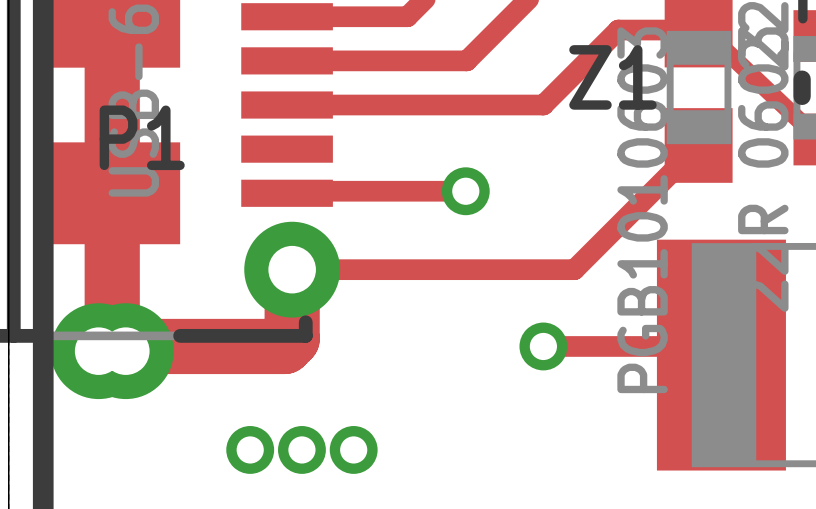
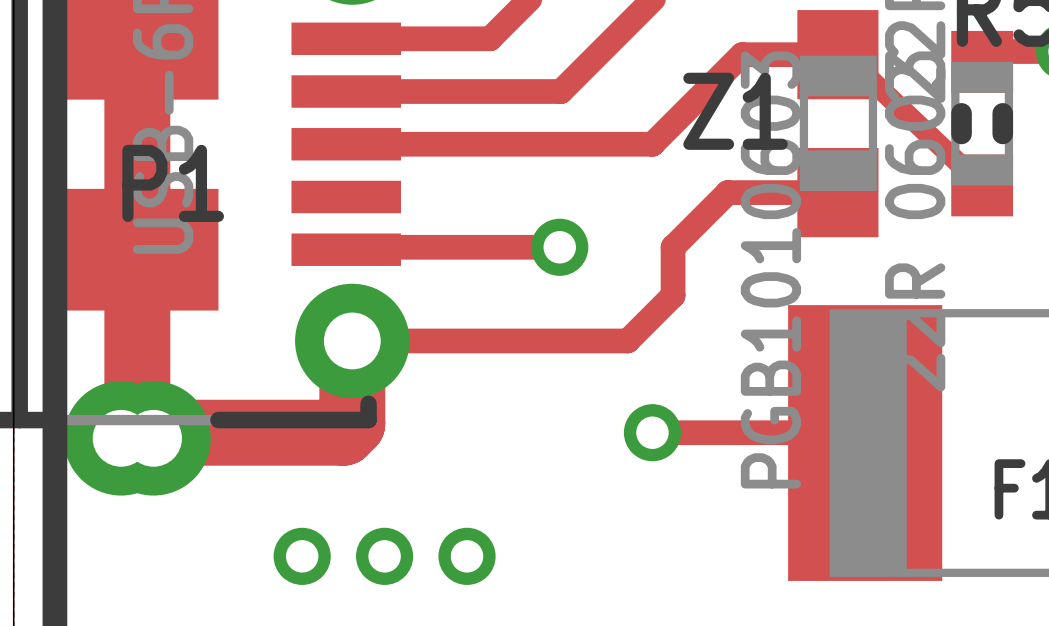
track: (698, 145) (574, 269) (522, 269) -> (837, 192) (727, 192) (673, 247) (673, 295) (627, 340)
via: (301, 449) -> none
via: none -> (384, 556)
via: (353, 449) -> none
via: none -> (467, 556)

